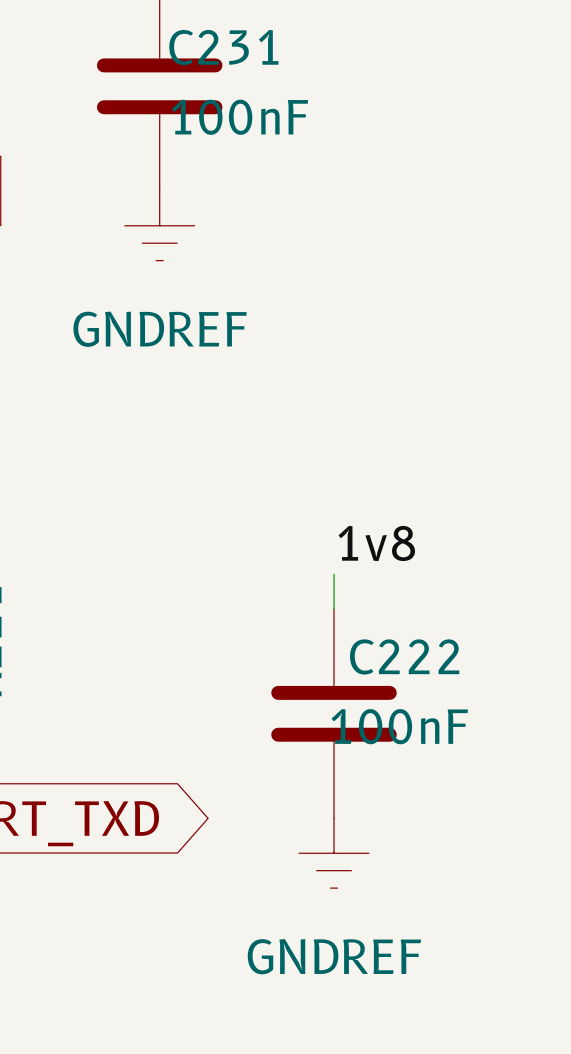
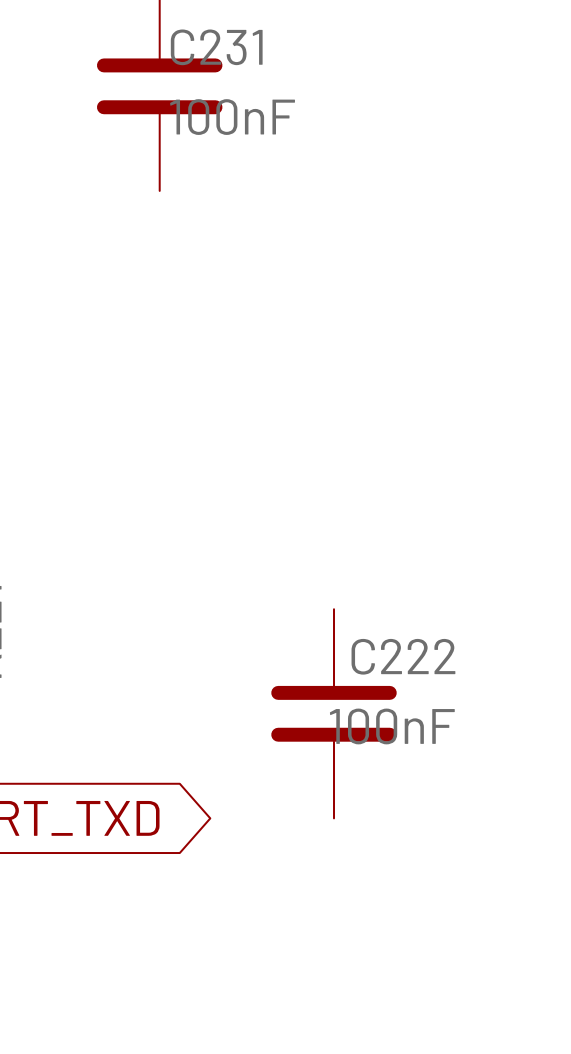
power symbol: GNDREF (159, 225) -> none
label: 1v8 (376, 543) -> none
wire: (334, 574) (334, 609) -> none
power symbol: GNDREF (334, 853) -> none

